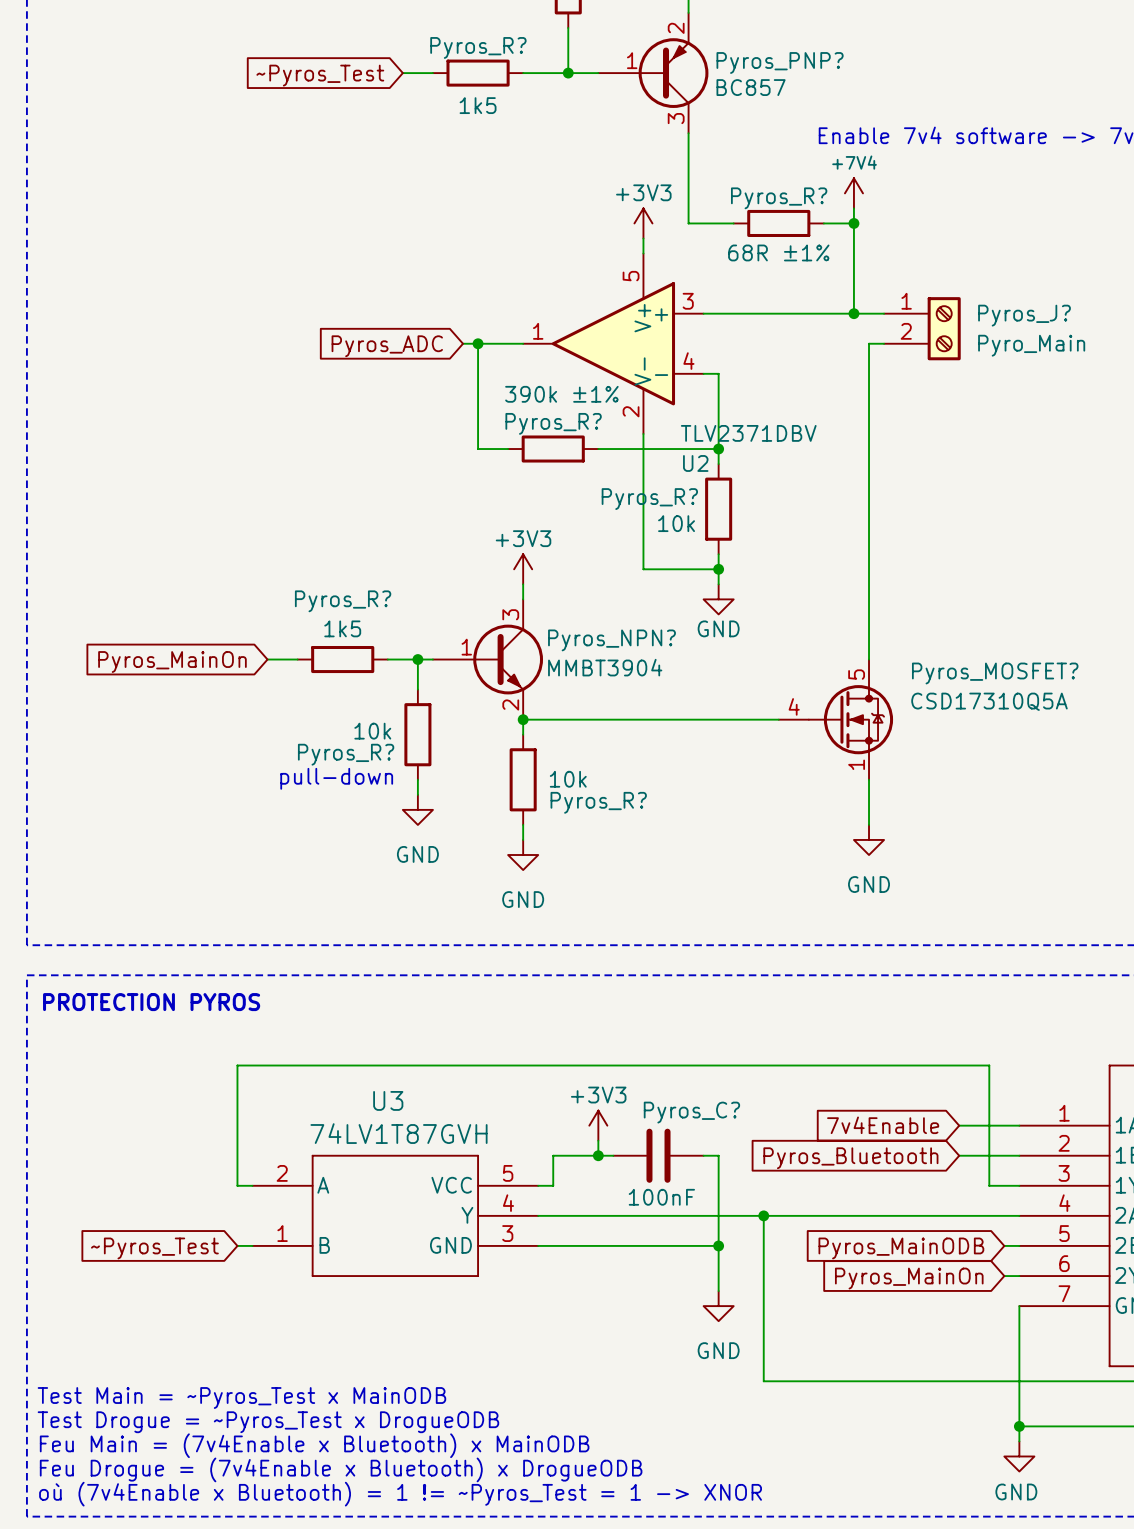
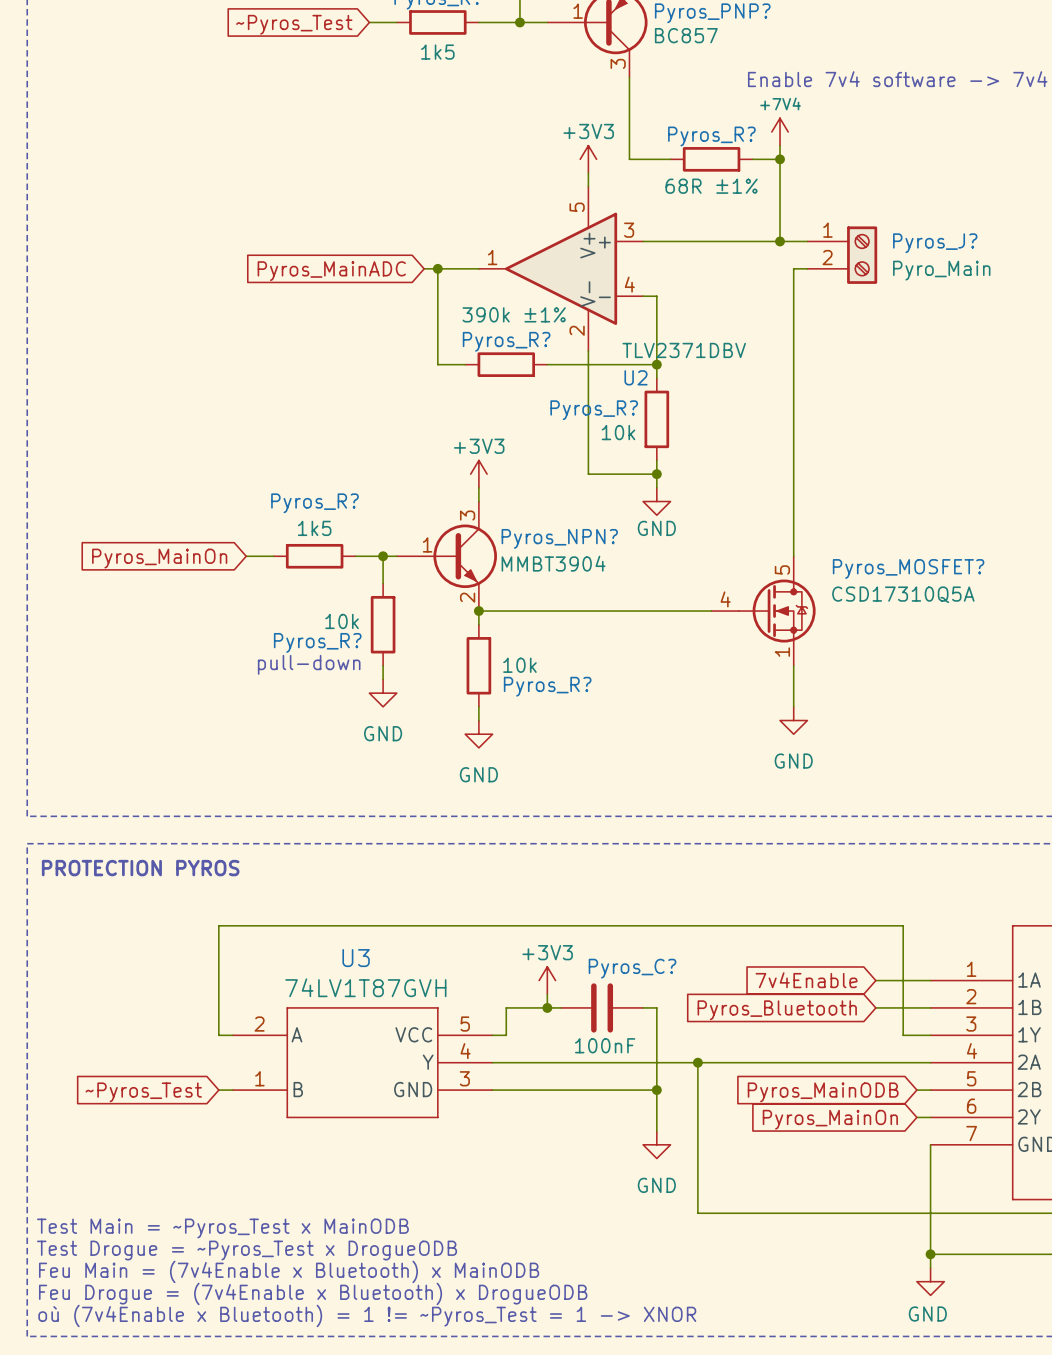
global label: Pyros_ADC (387, 346) -> Pyros_MainADC (331, 271)

